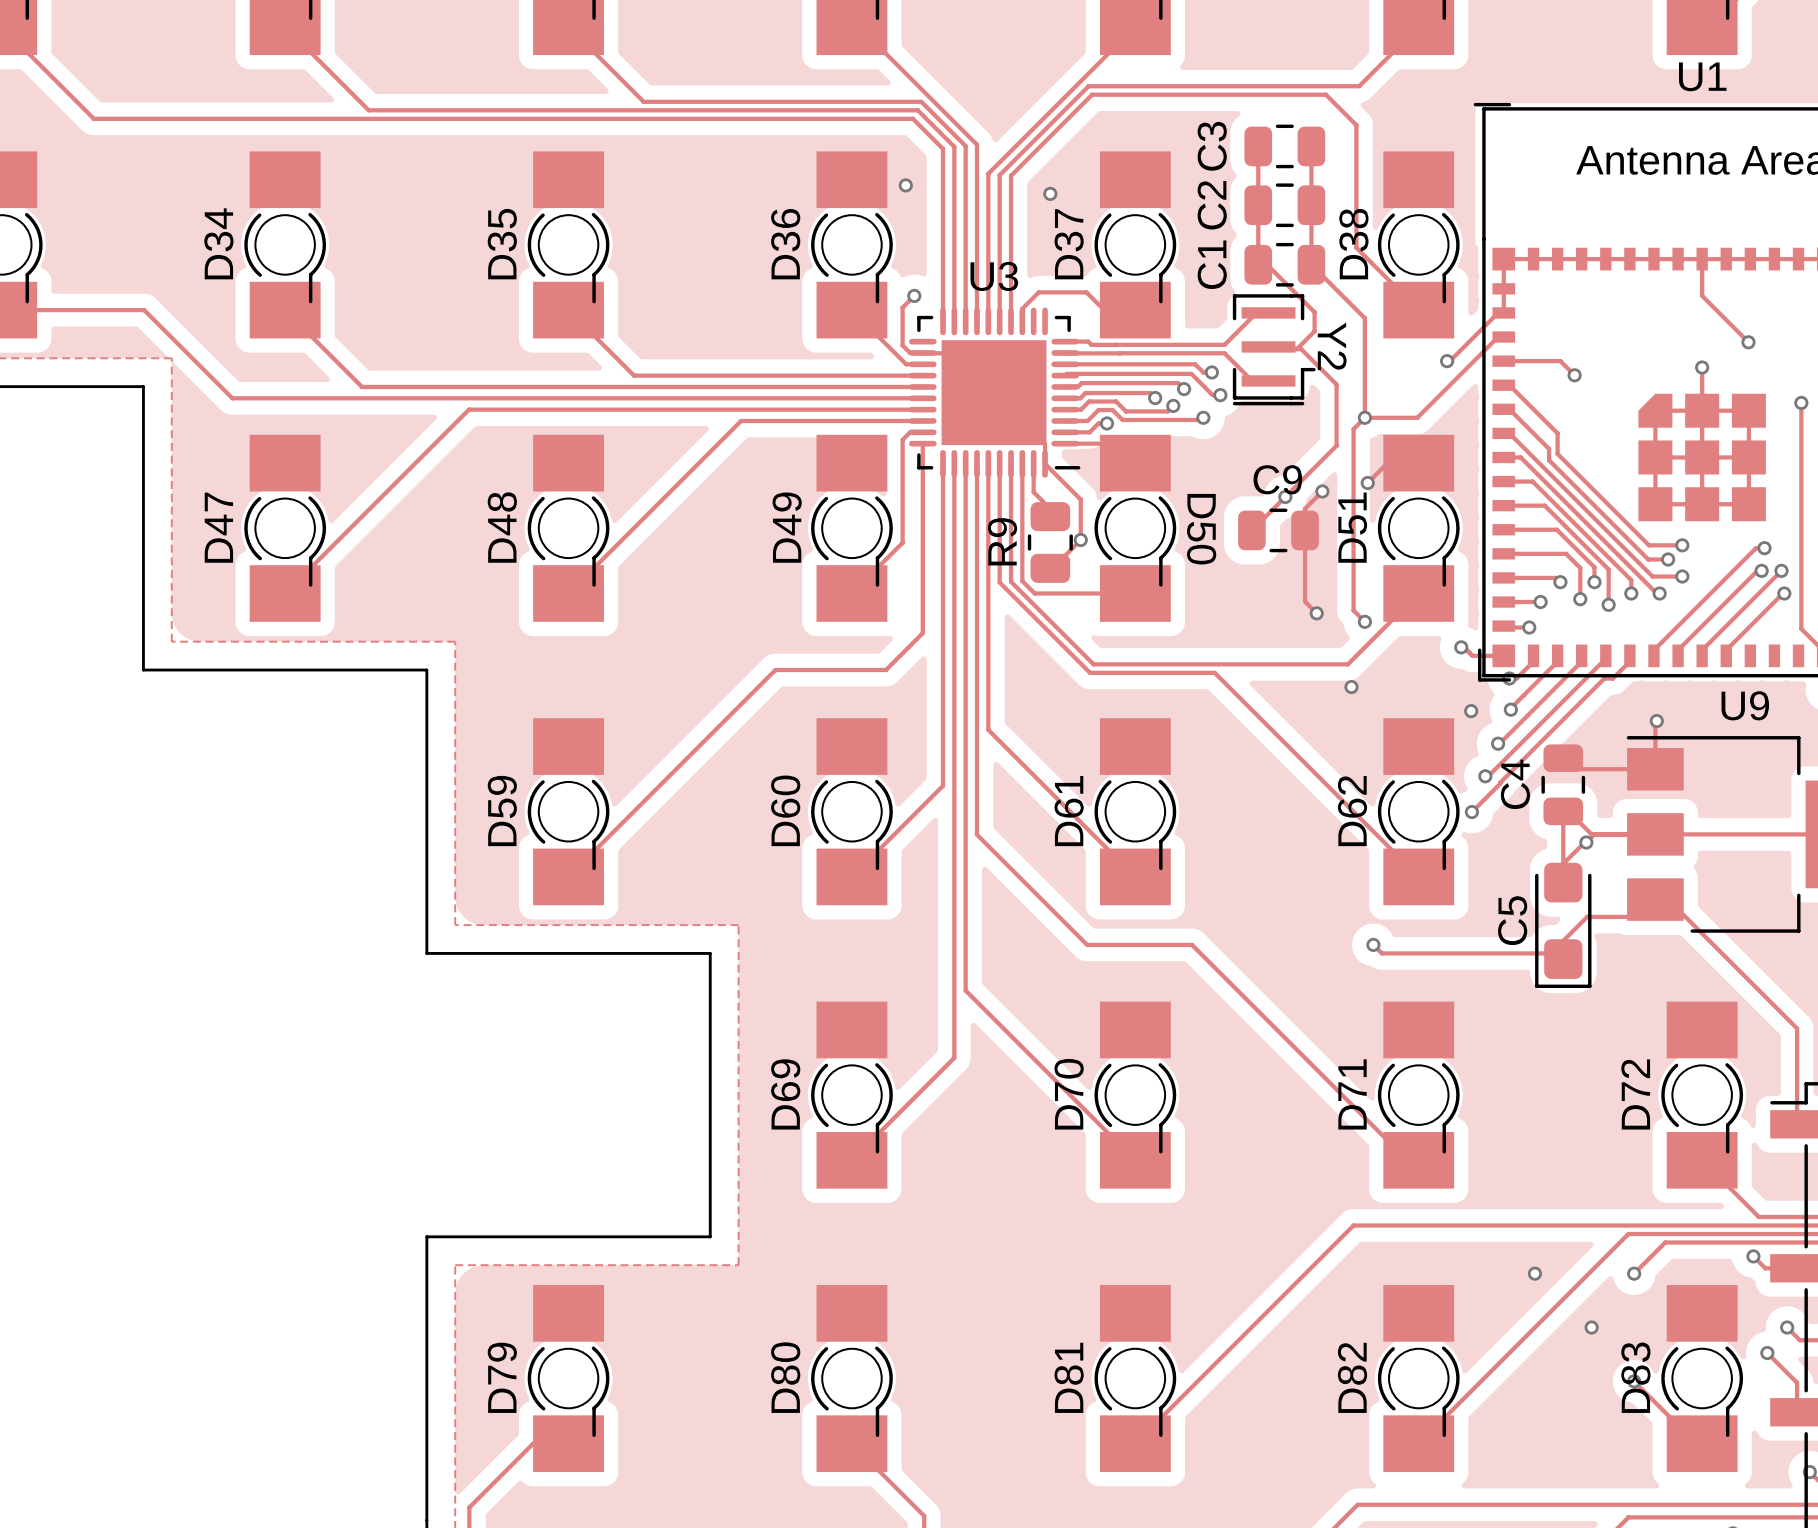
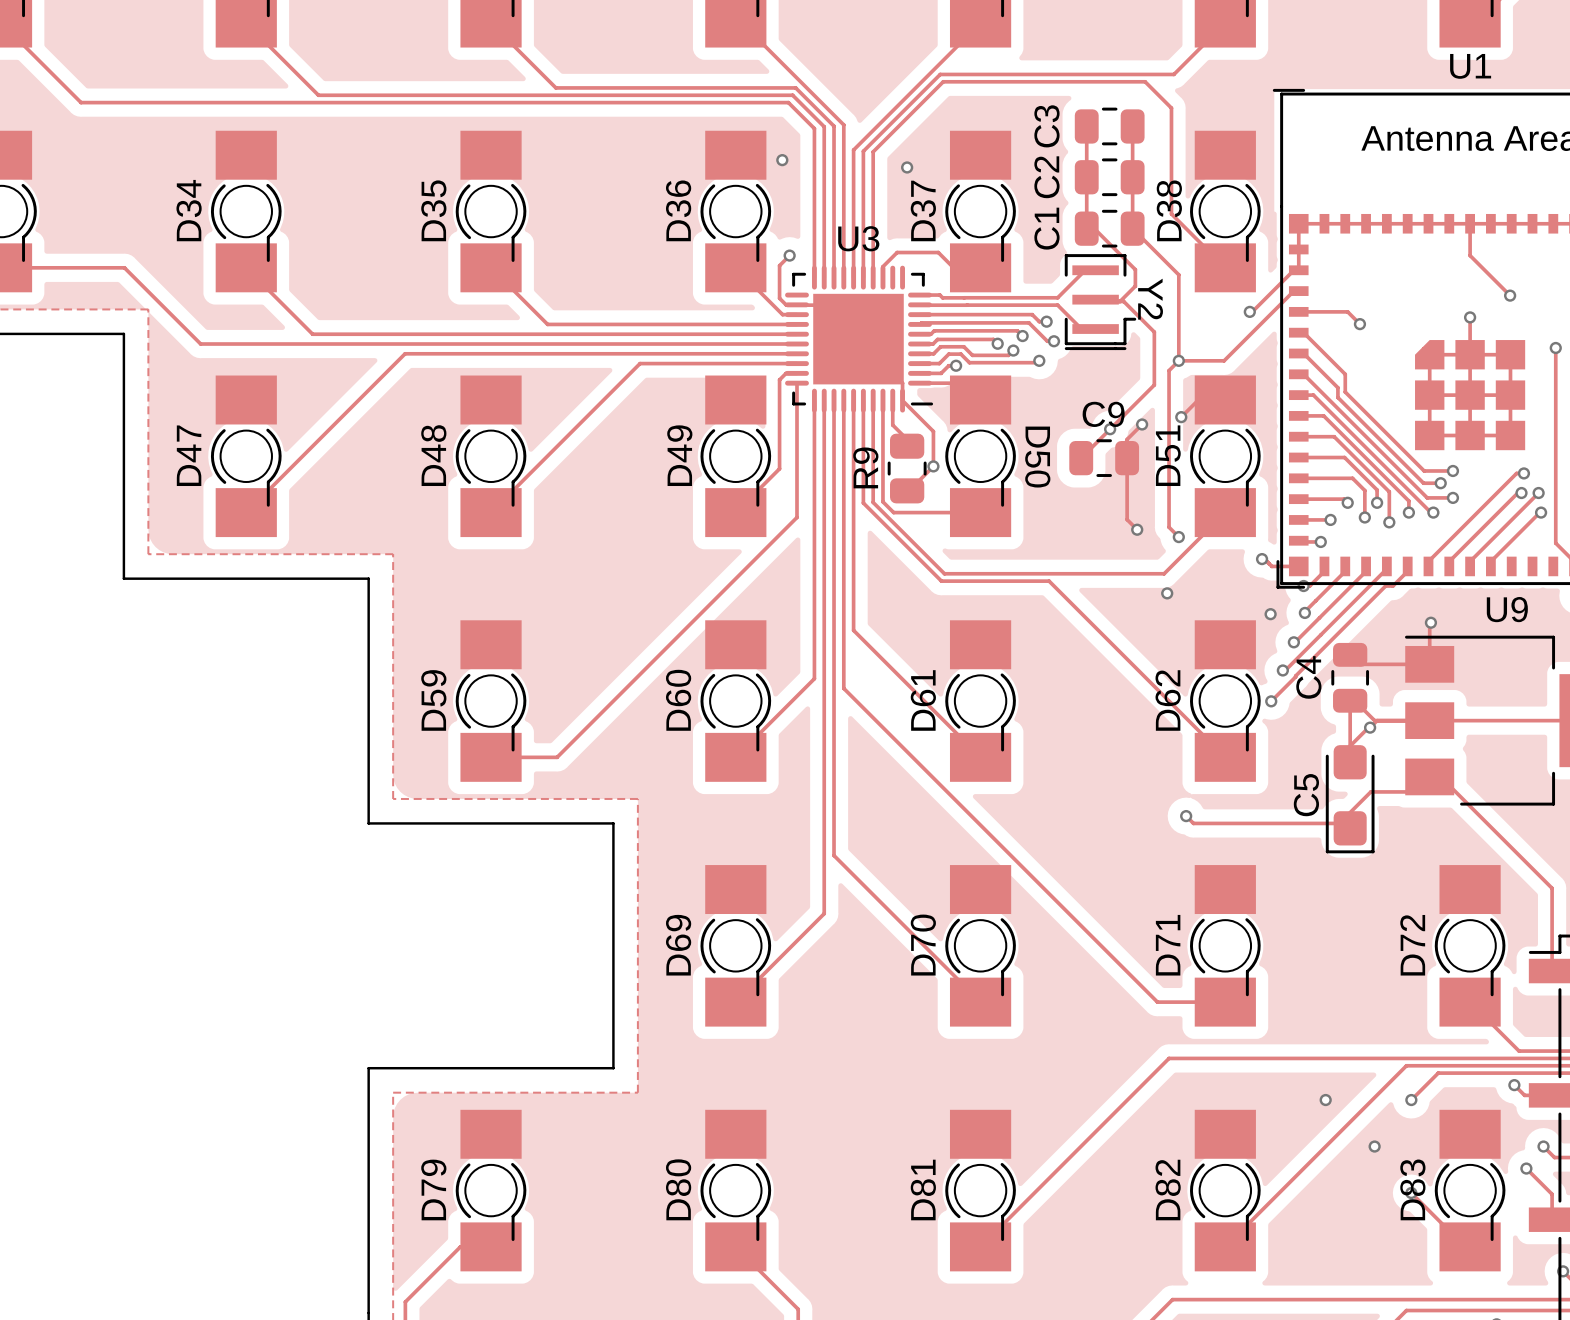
track: (922, 599) (922, 633) (885, 670) (775, 670) (568, 876) -> (796, 517) (557, 757) (491, 757)
track: (977, 797) (977, 834) (1087, 944) (1192, 944) (1407, 1160) -> (843, 688) (1157, 1002) (1215, 1002)

